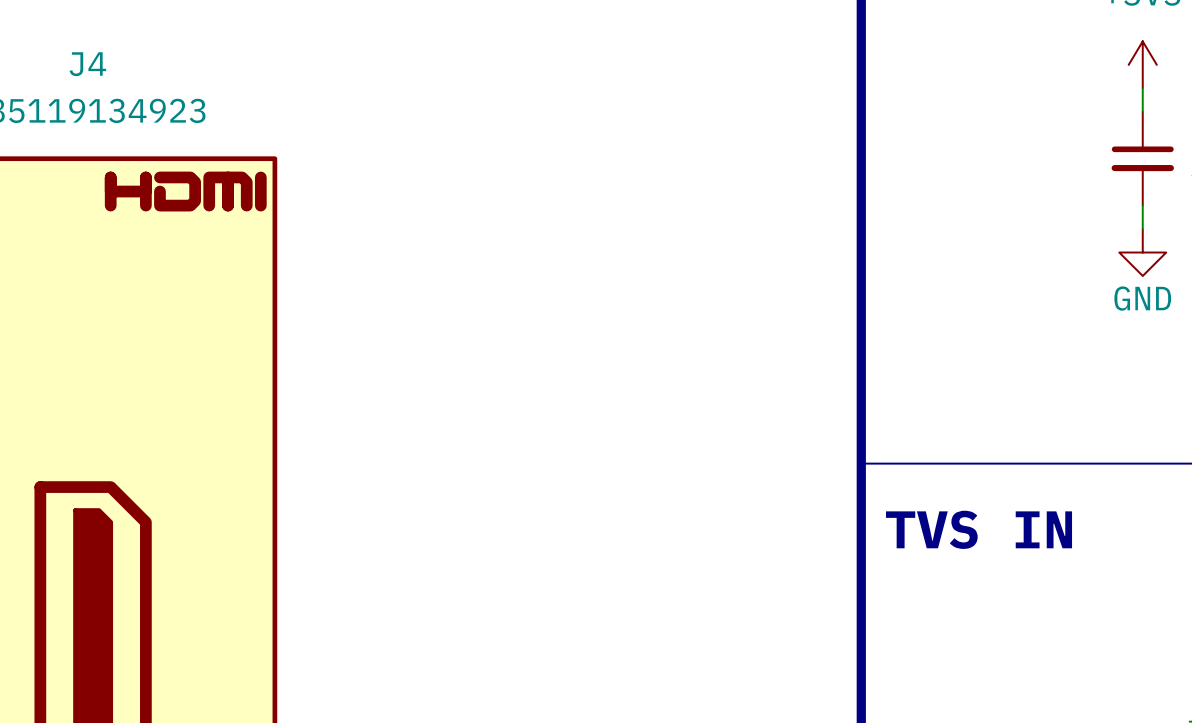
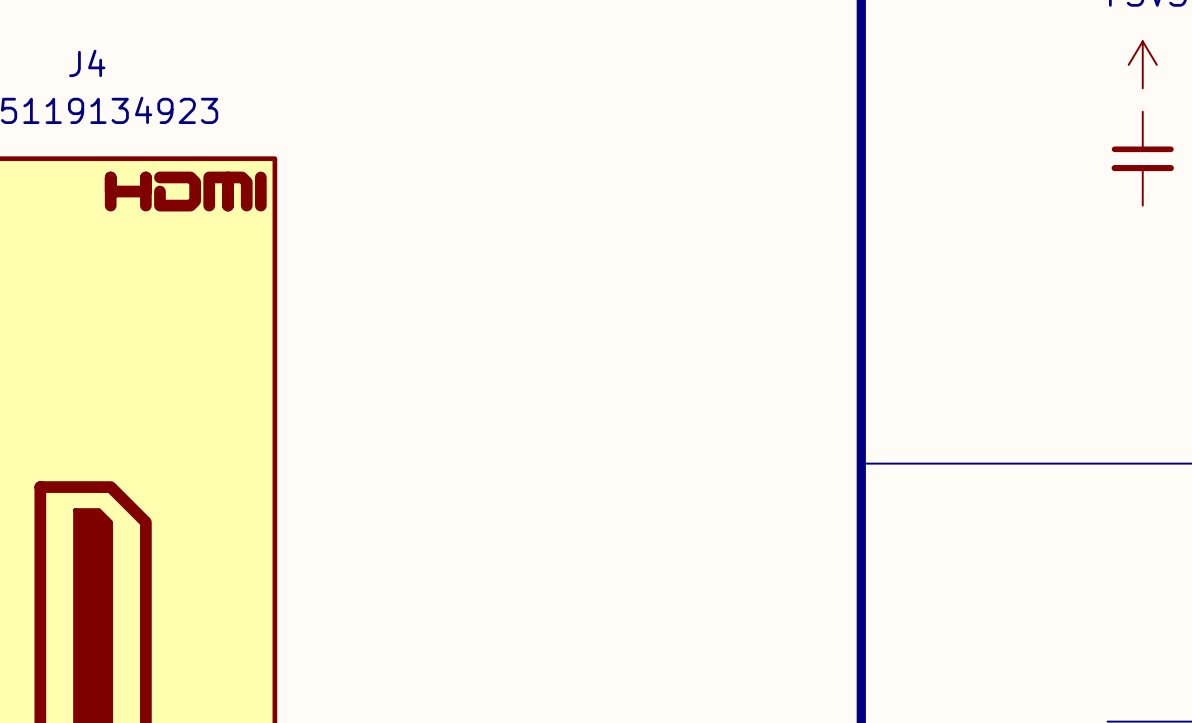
wire: (1142, 88) (1142, 111) -> none
wire: (1142, 205) (1142, 229) -> none
power symbol: GND (1142, 252) -> none
text: TVS IN (979, 529) -> none
wire: none -> (1107, 721) (1189, 721)

